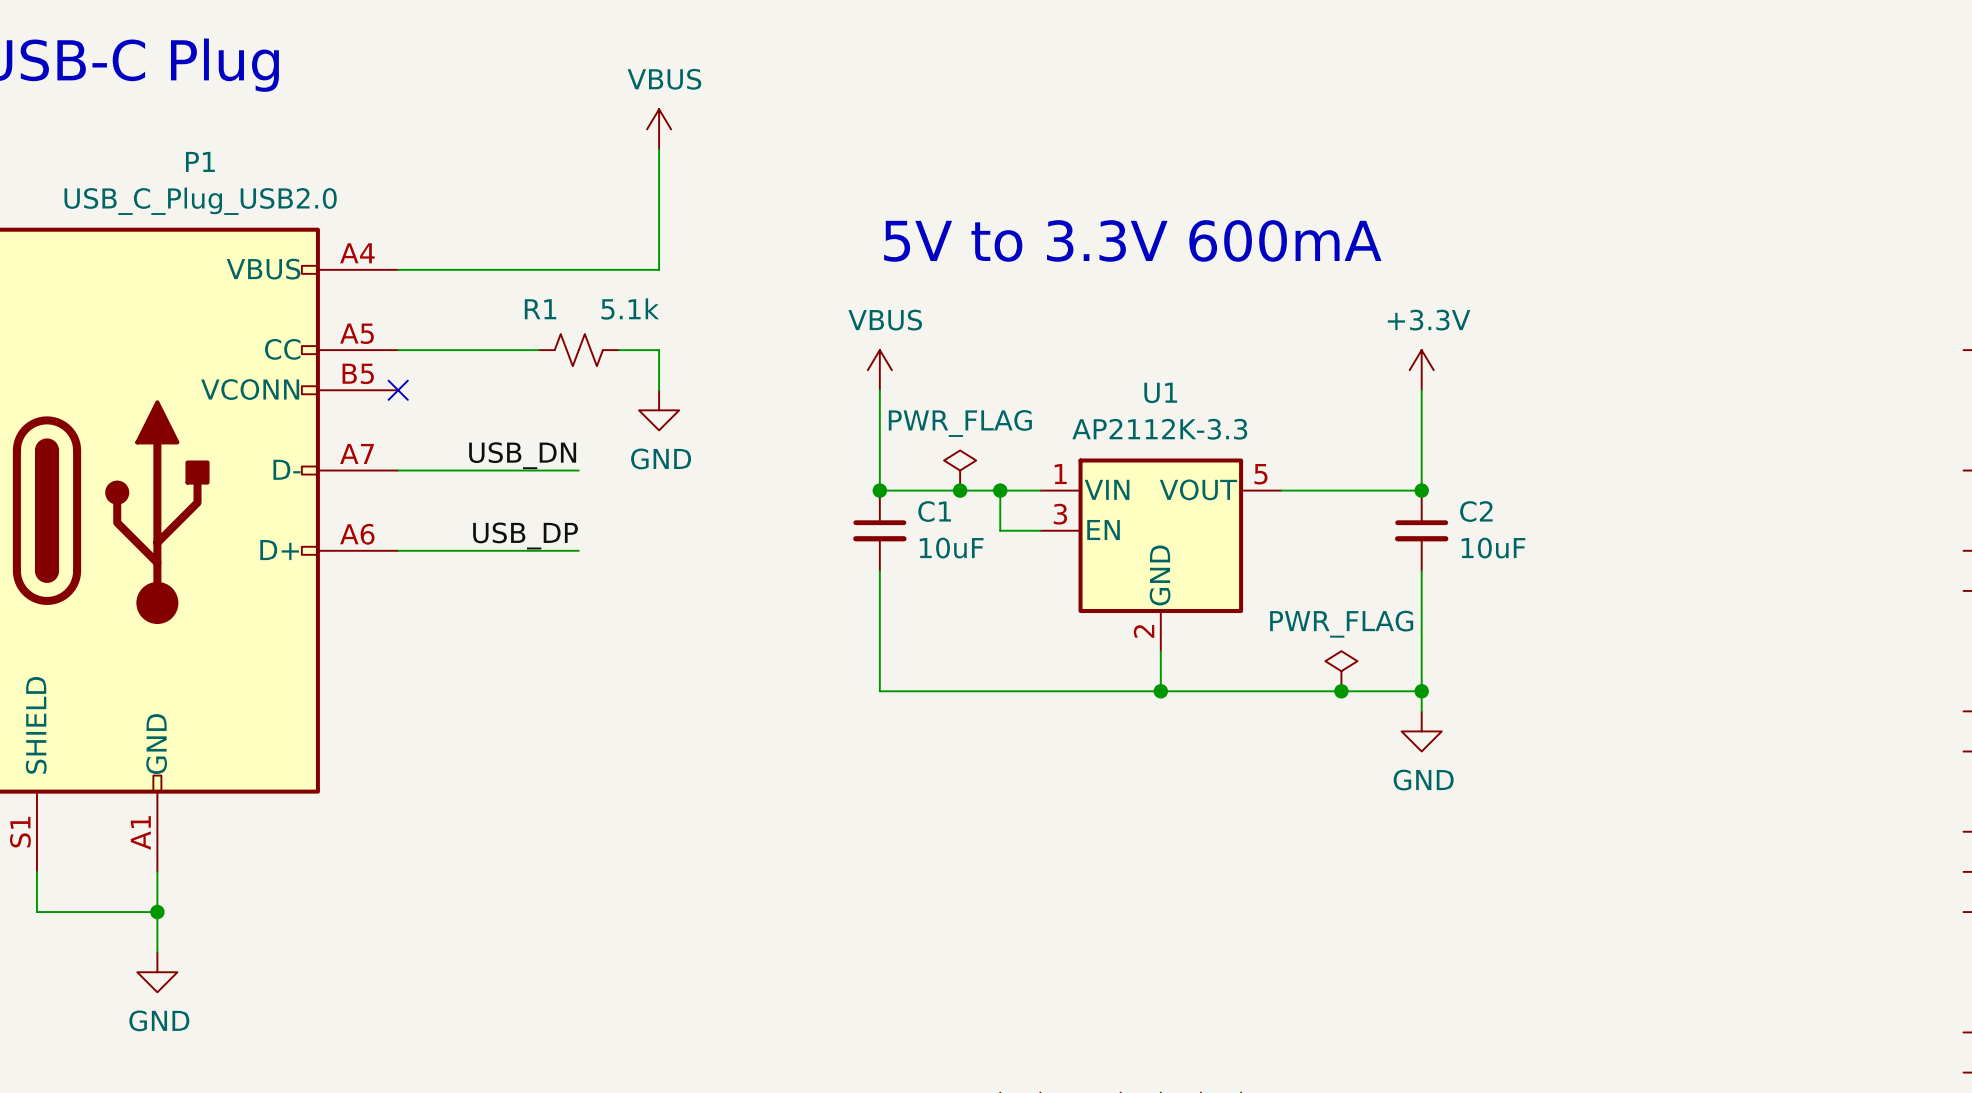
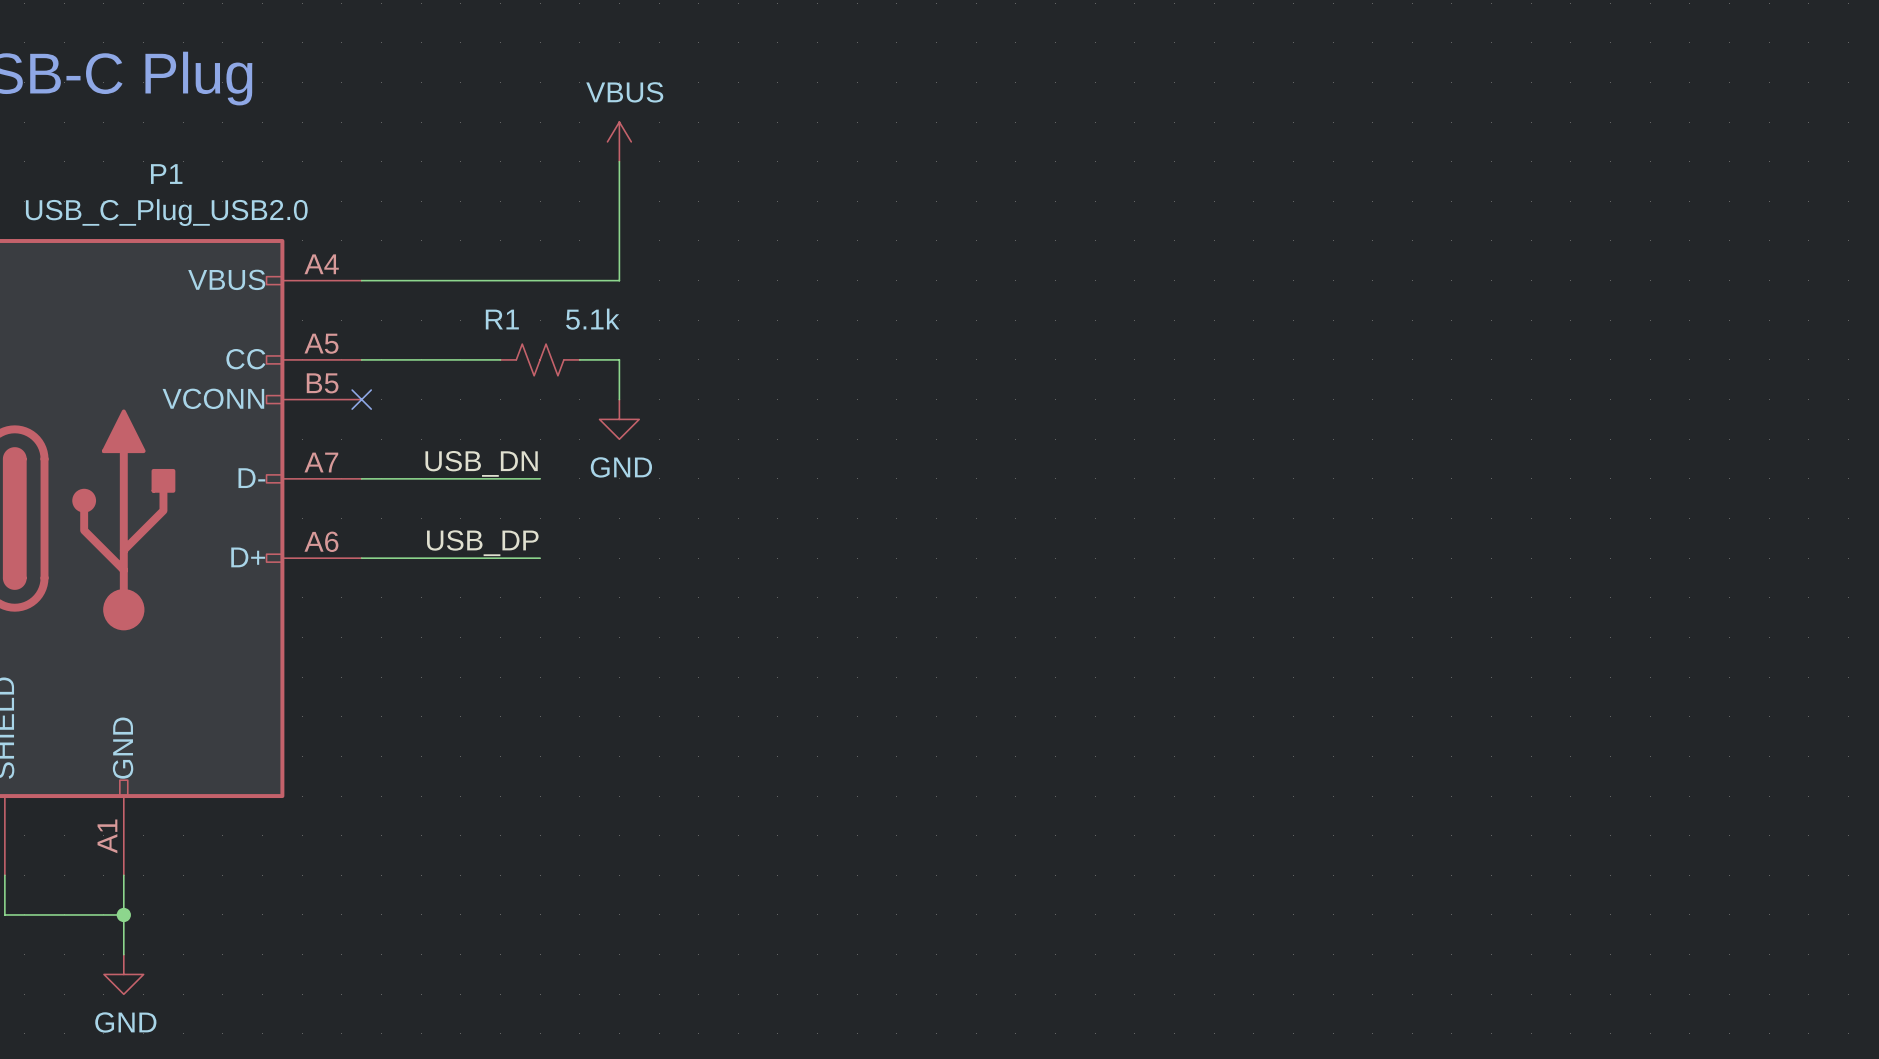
text: 5V to 3.3V 600mA (1132, 240) -> none
power symbol: VBUS (879, 370) -> none
power symbol: +3.3V (1421, 370) -> none
wire: (879, 390) (879, 490) (1040, 490) -> none
wire: (1421, 390) (1421, 490) (1281, 490) -> none
power symbol: PWR_FLAG (960, 470) -> none
junction: (879, 490) -> none
junction: (960, 490) -> none
wire: (1000, 490) (1000, 530) (1040, 530) -> none
junction: (1000, 490) -> none
junction: (1421, 490) -> none
C1: 10uF (879, 530) -> none
C2: 10uF (1421, 530) -> none
U1: AP2112K-3.3 (1160, 554) -> none
wire: (879, 570) (879, 691) (1421, 691) -> none
wire: (1421, 570) (1421, 711) -> none
wire: (1160, 651) (1160, 691) -> none
power symbol: PWR_FLAG (1341, 671) -> none
junction: (1160, 691) -> none
junction: (1341, 691) -> none
junction: (1421, 691) -> none
power symbol: GND (1421, 731) -> none

